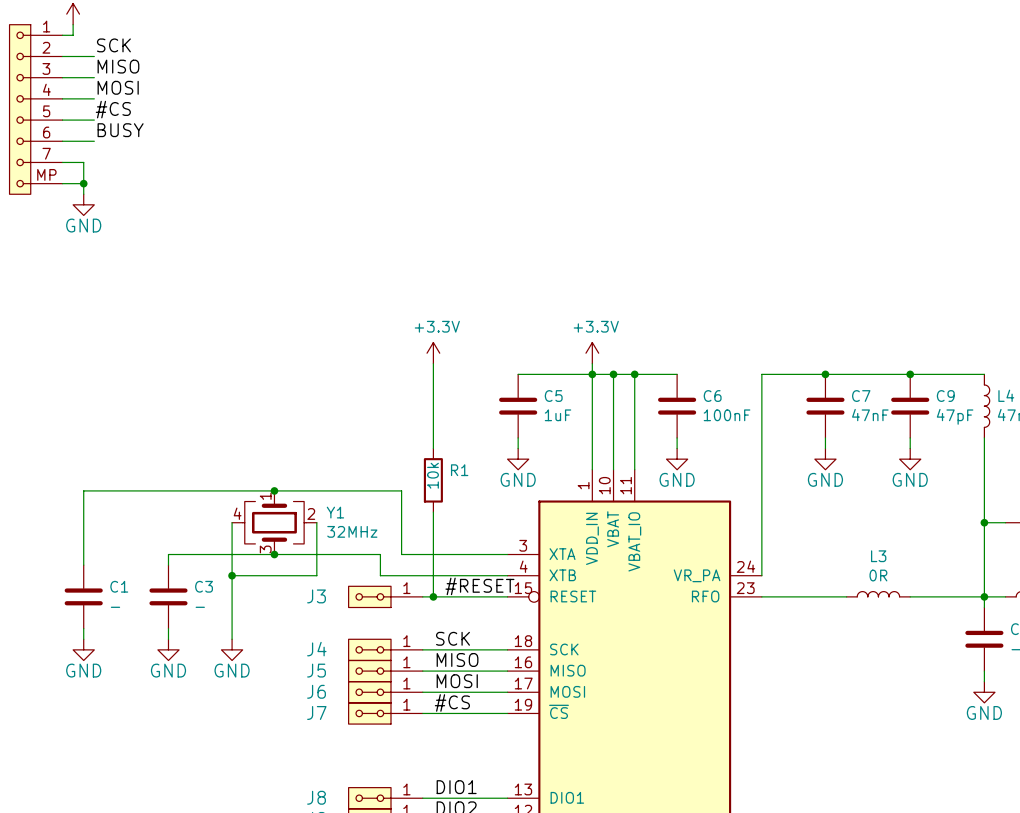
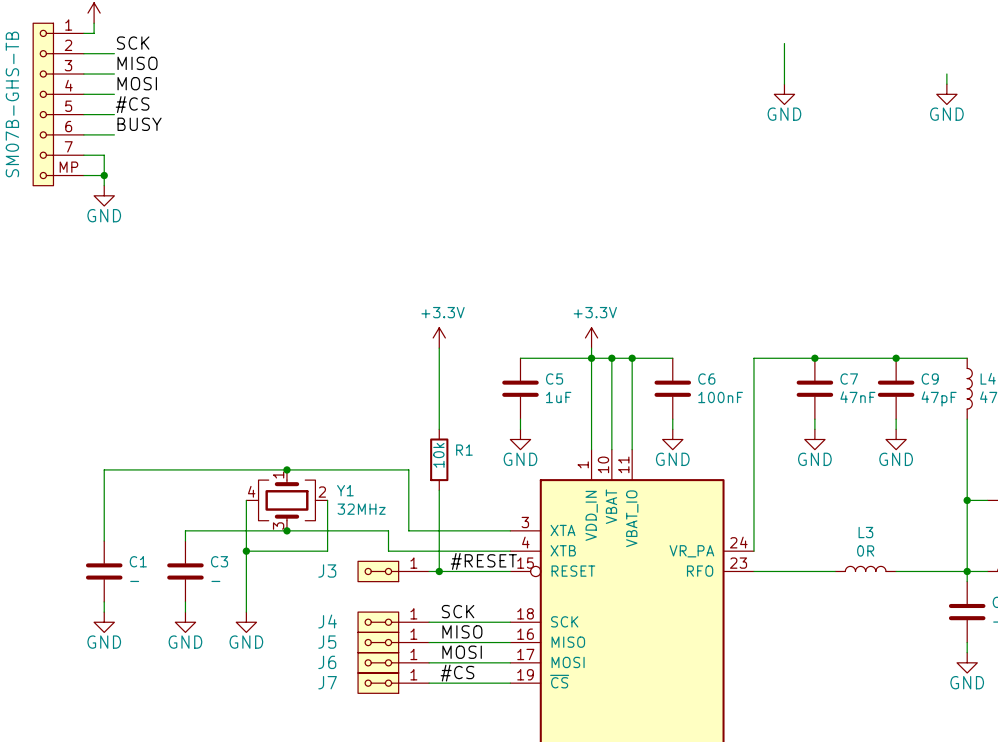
wire: none -> (784, 43) (784, 84)
wire: none -> (946, 74) (946, 84)
power symbol: none -> GND (784, 94)
power symbol: none -> GND (946, 94)

